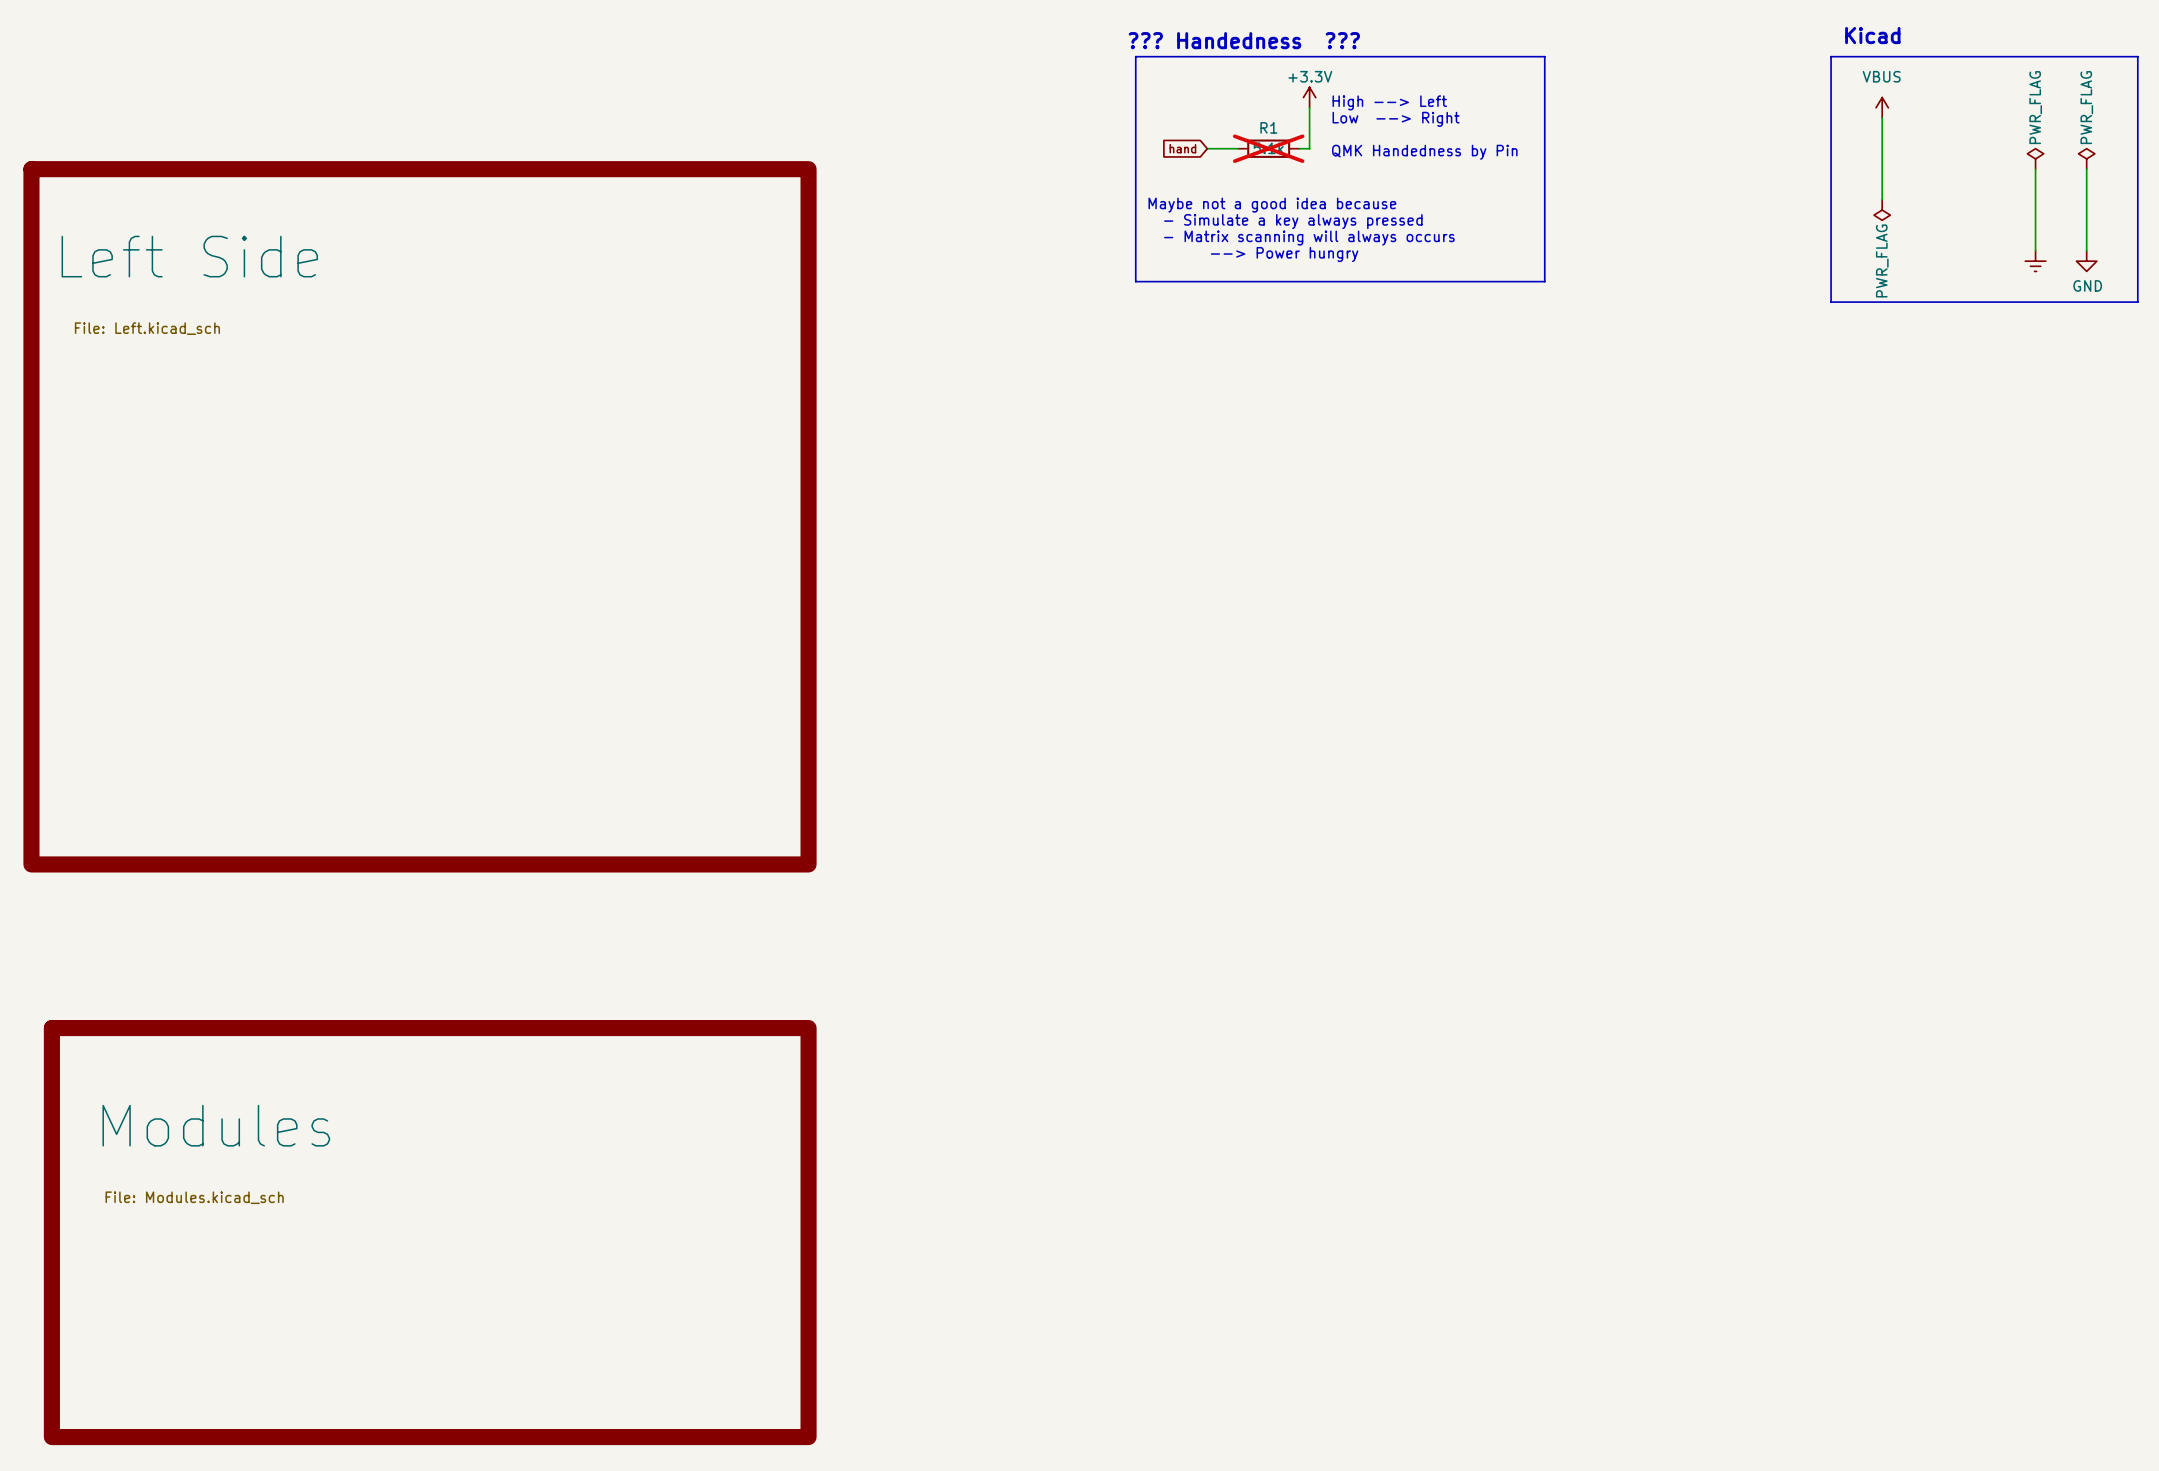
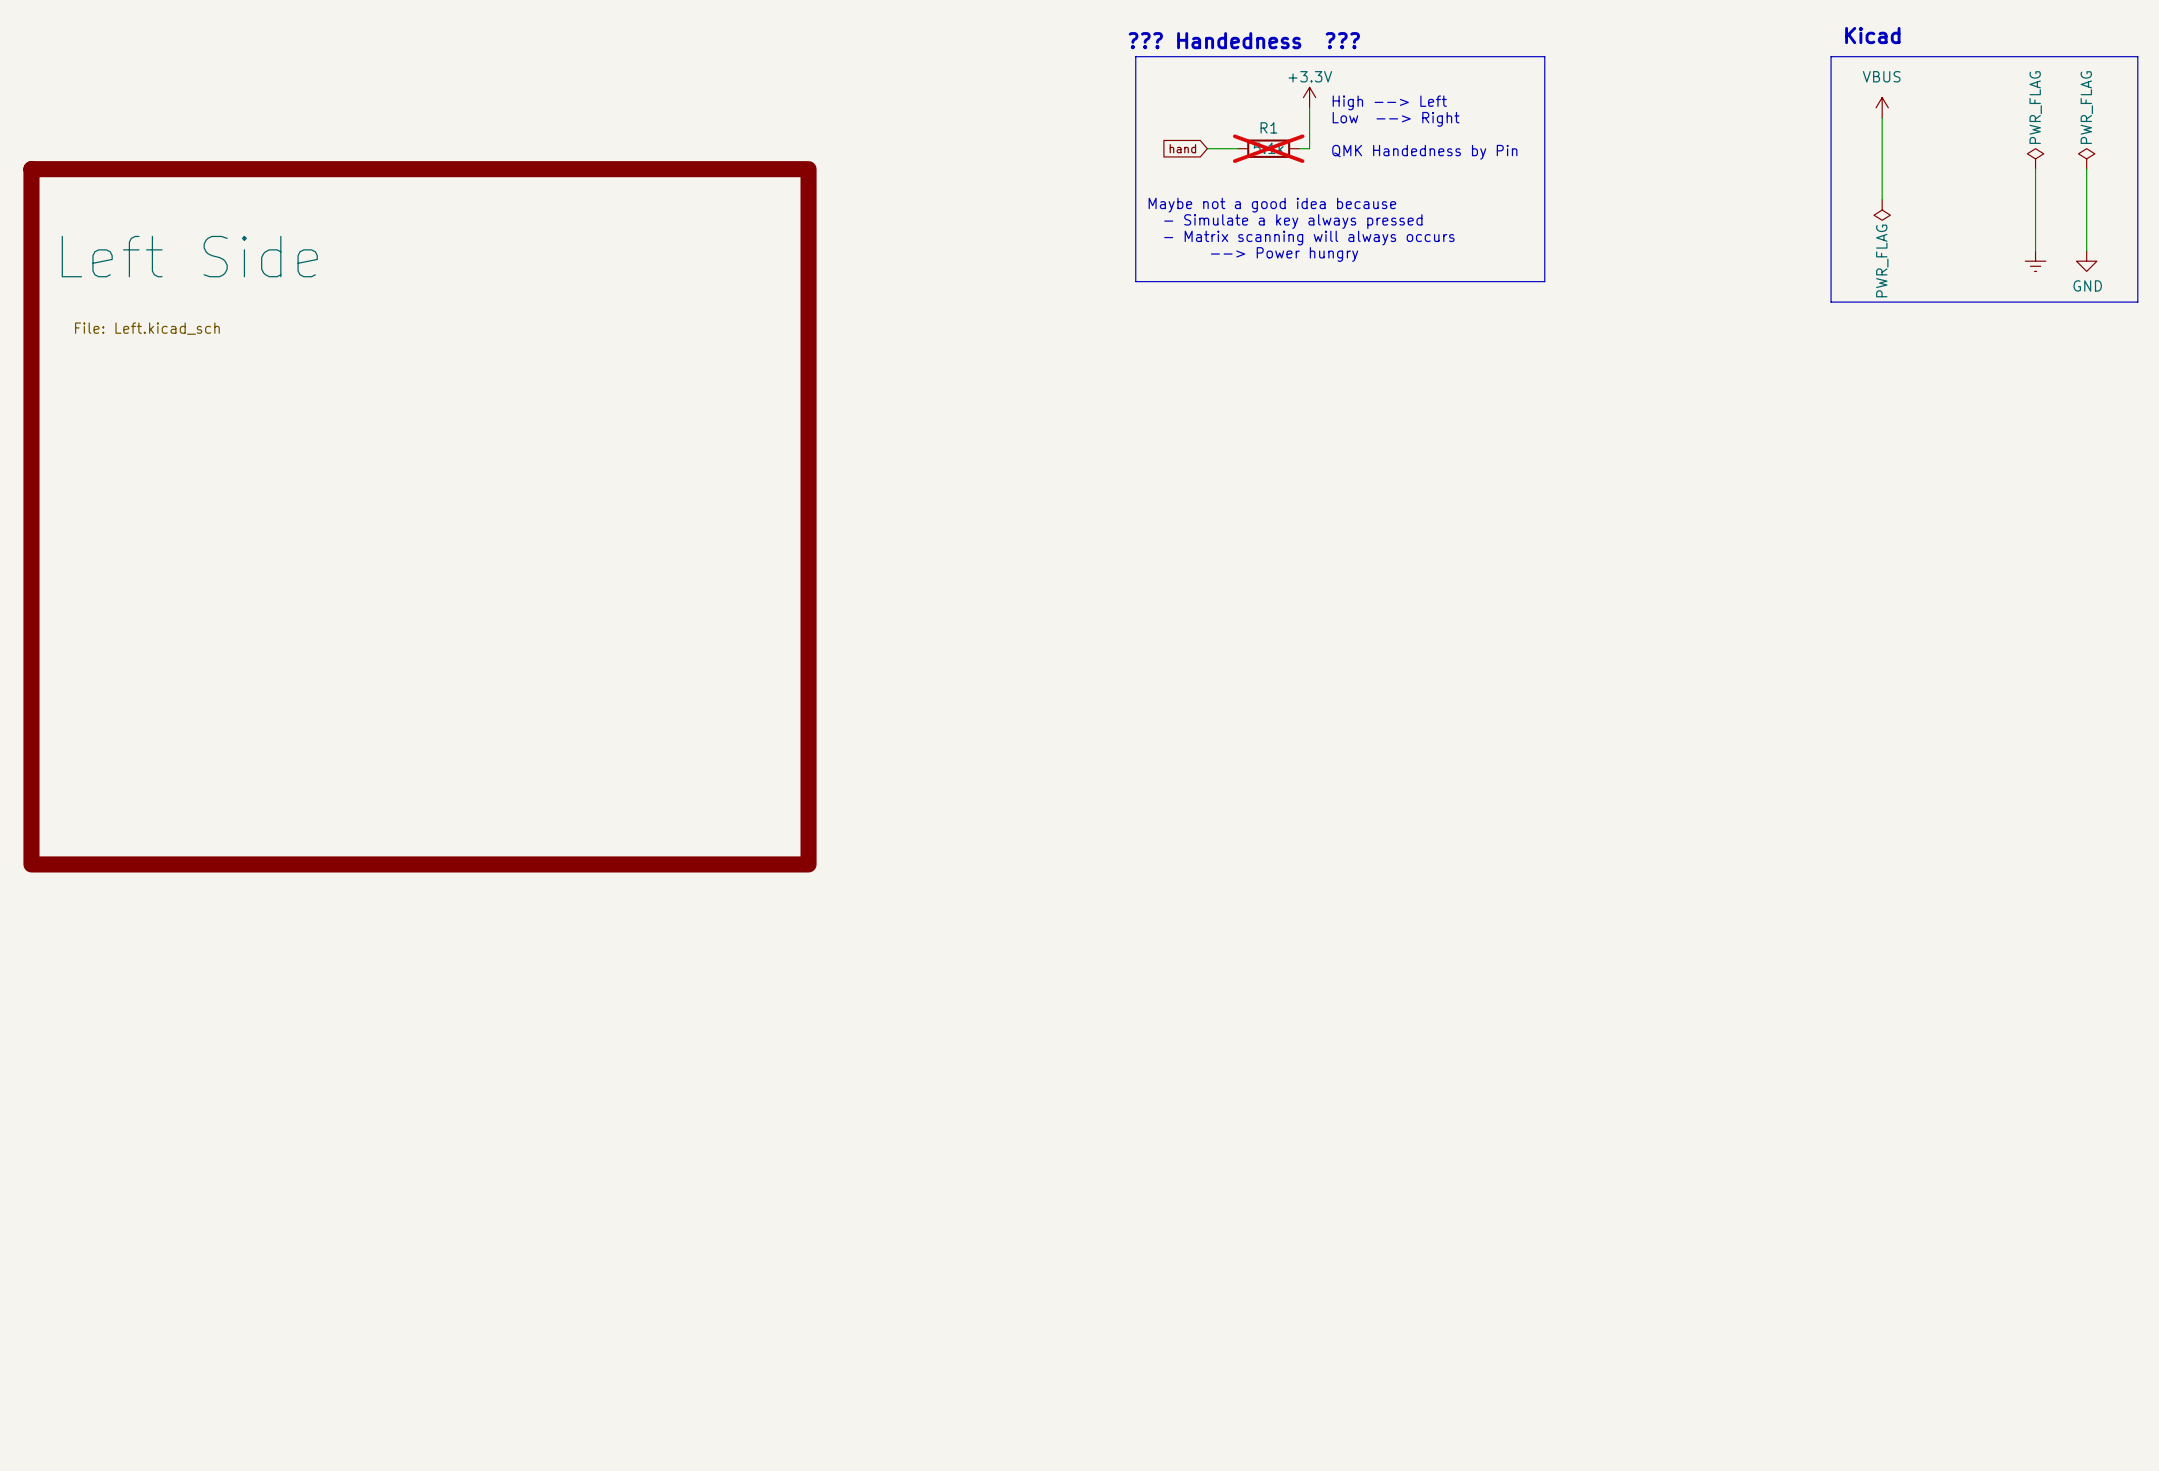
sheet Modules: File: Modules.kicad_sch (430, 1232) -> none

